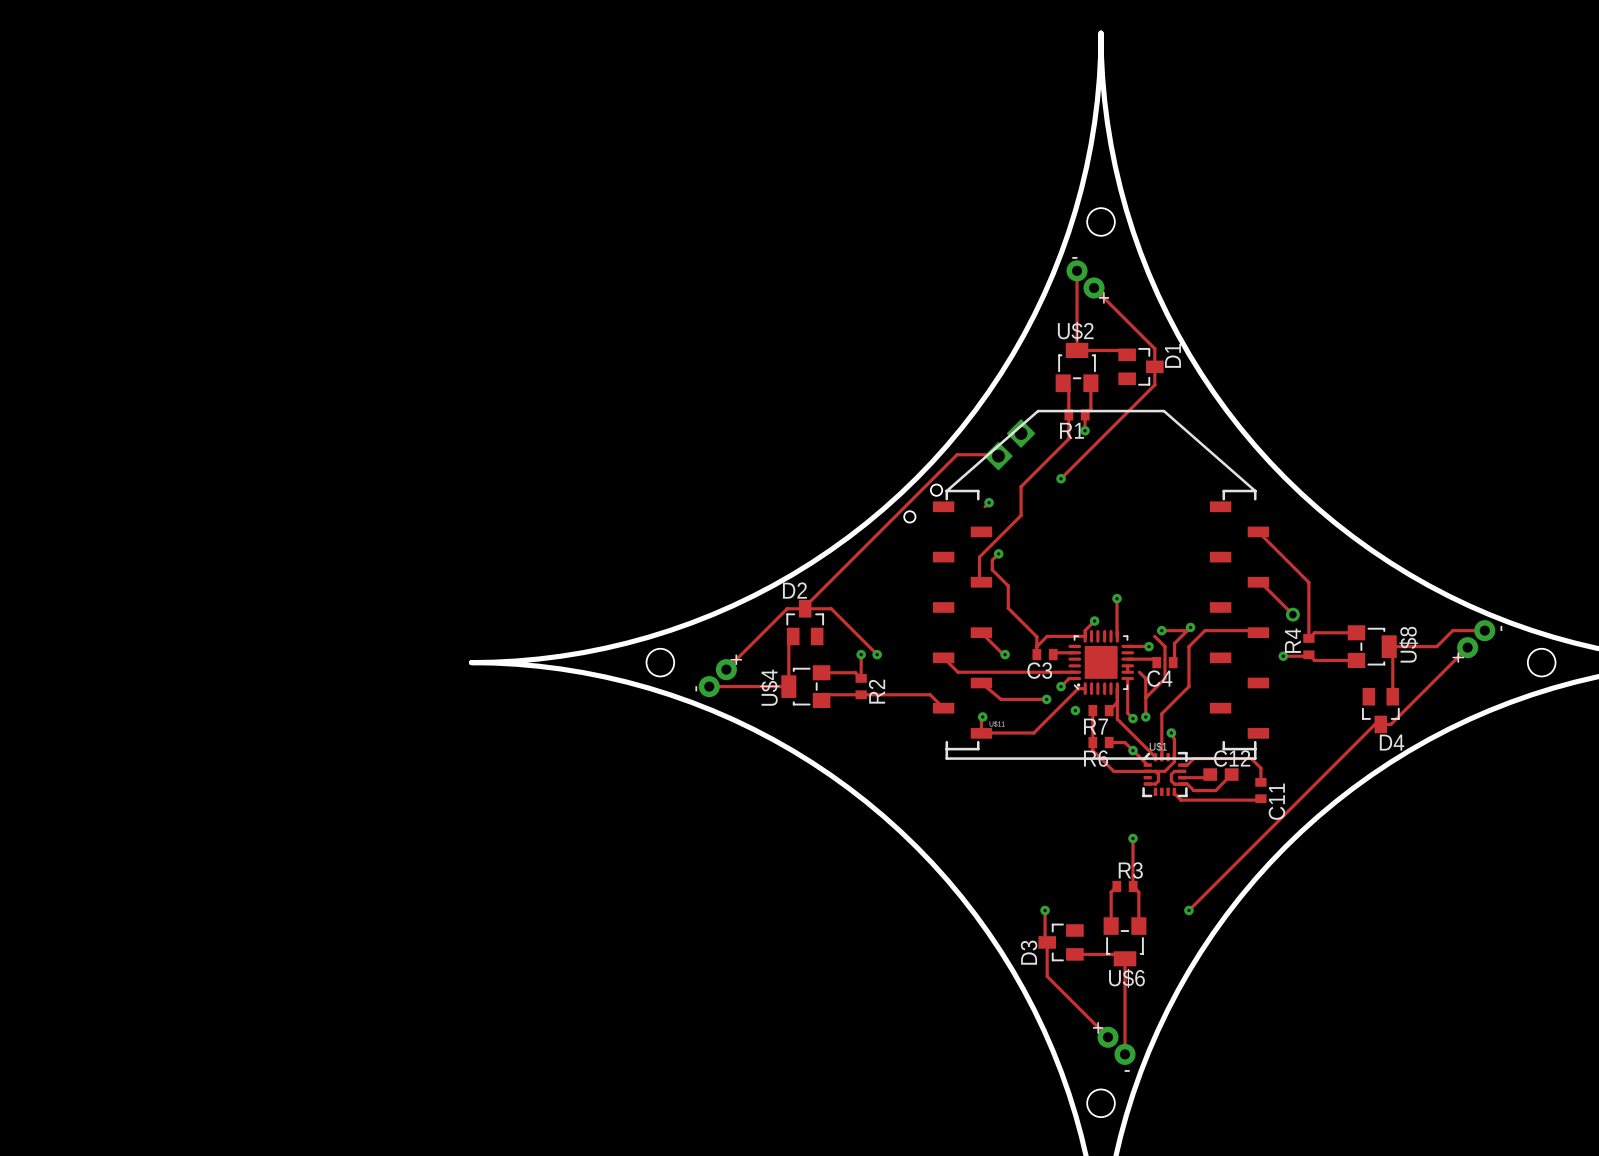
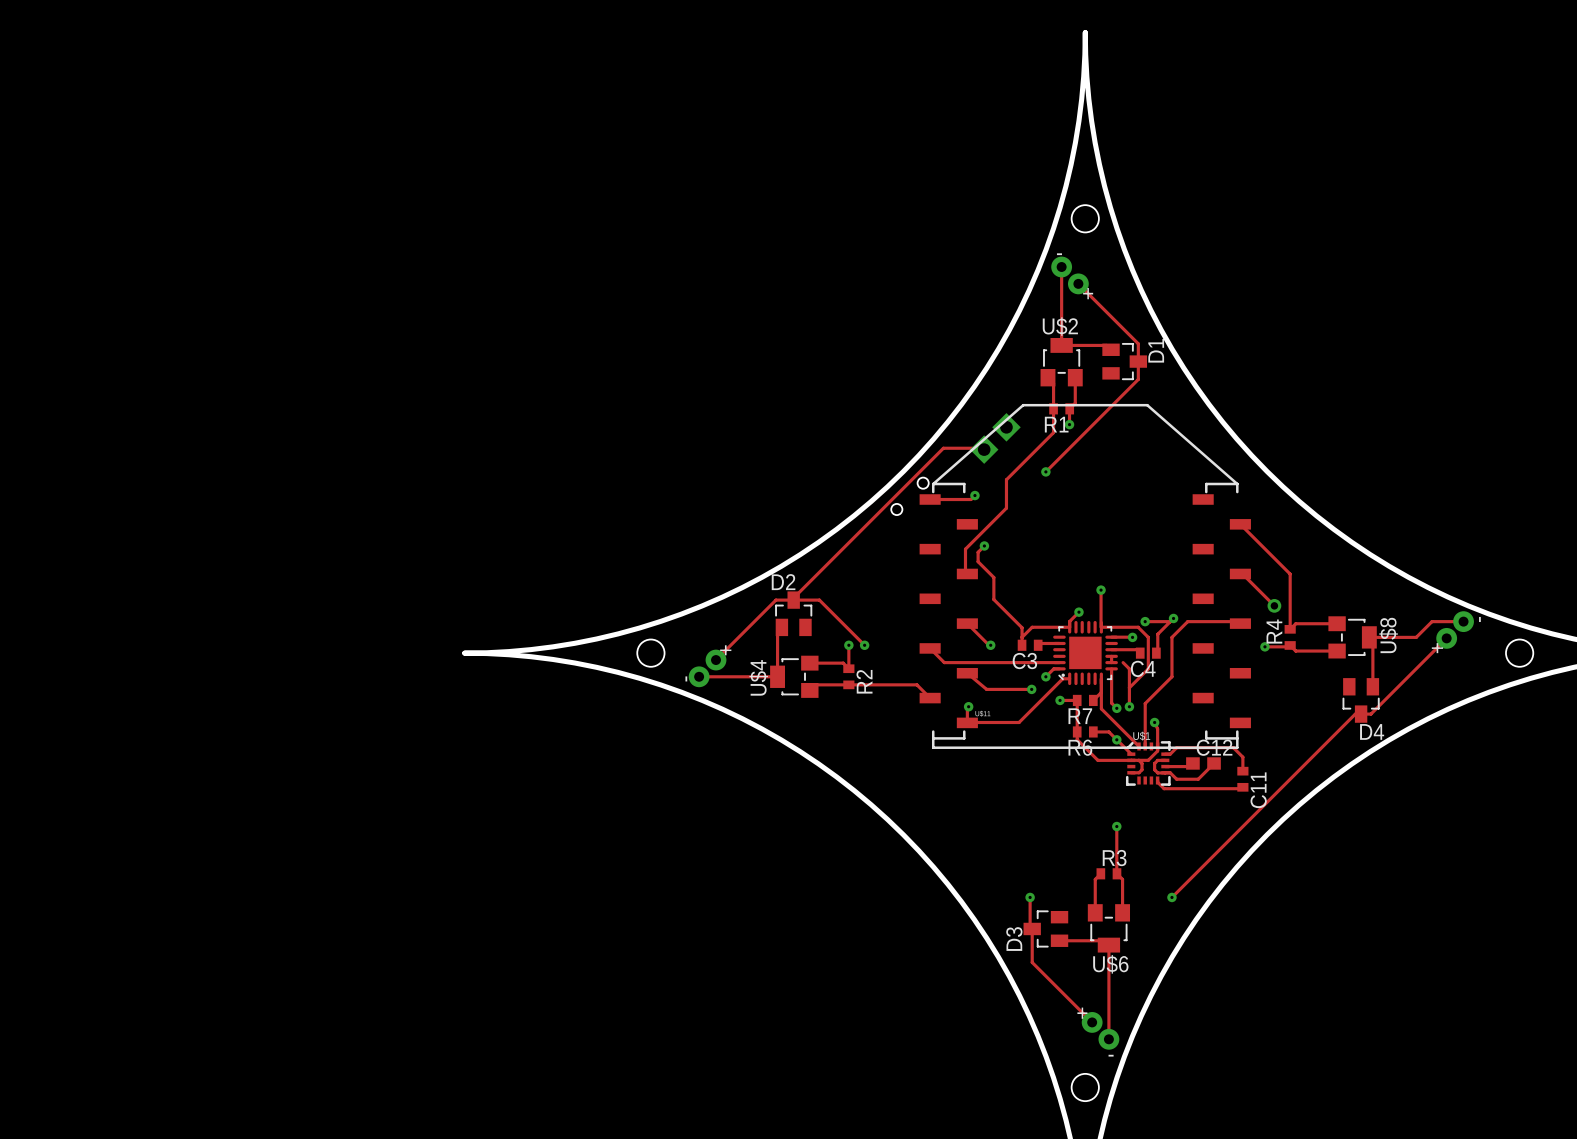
track: none -> (930, 499) (970, 499)
track: none -> (1101, 627) (1138, 627)
track: none -> (1060, 700) (1077, 700)

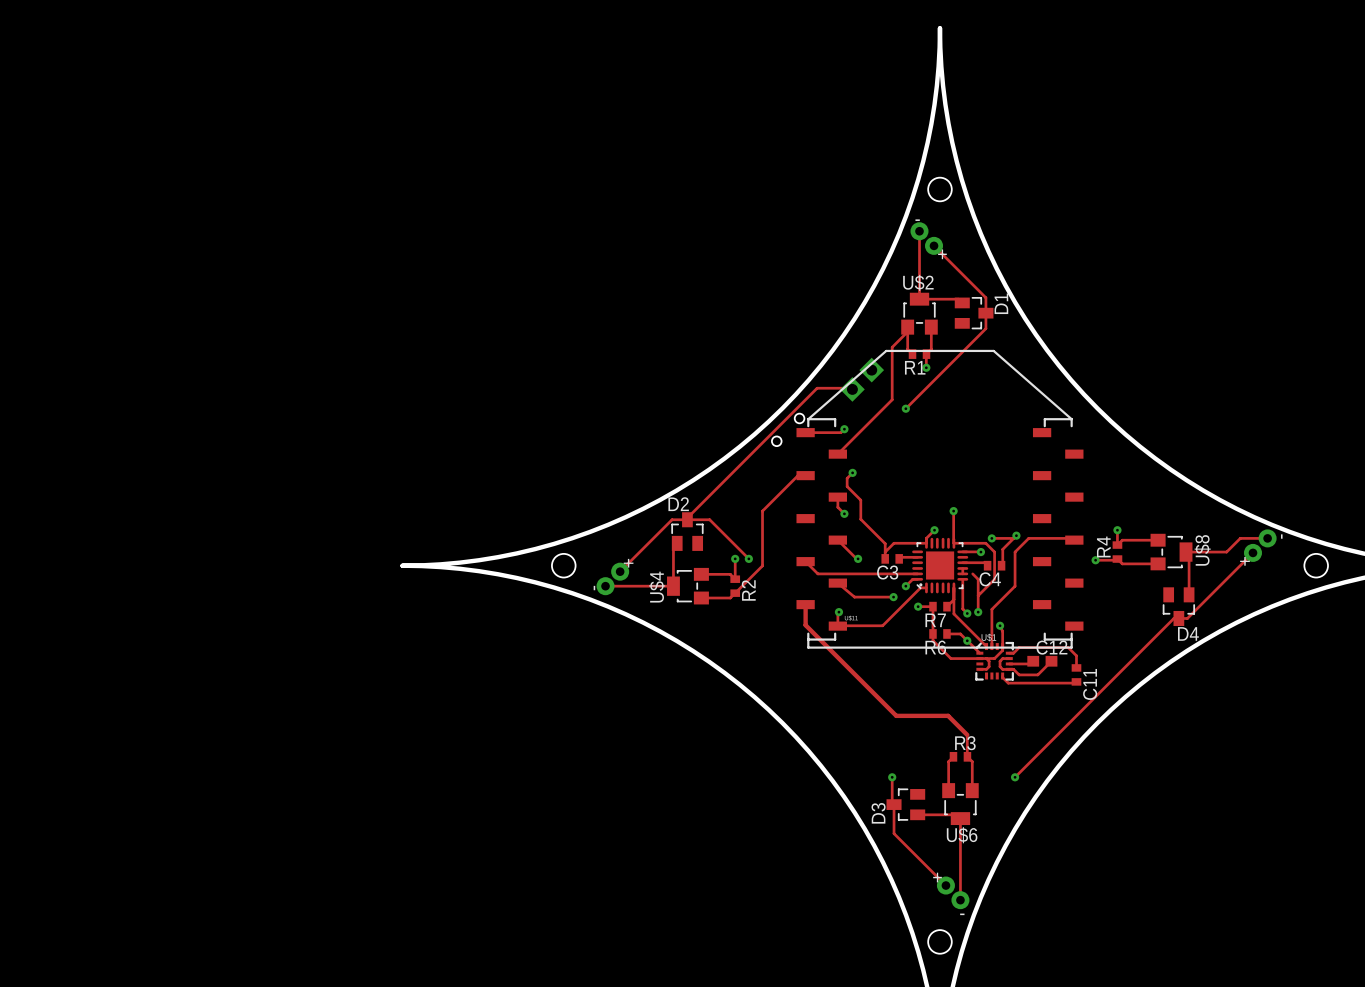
track: (1047, 377) (1053, 383) (1053, 432) (1006, 479) (1006, 508) (965, 549) (965, 572) (967, 573) -> (907, 327) (907, 349) (912, 354)
track: none -> (907, 331) (892, 347) (892, 399) (837, 454)
track: (1240, 524) (1290, 574) (1290, 612) -> none
track: none -> (837, 497) (837, 507) (844, 513)
track: (1240, 573) (1274, 605) -> none
via: none -> (844, 513)
via: (1274, 605) -> none
via: none -> (1117, 530)
track: (809, 690) (815, 684) (916, 684) (930, 698) -> (701, 598) (730, 598) (762, 565) (762, 511) (797, 475) (805, 475)
track: (1116, 826) (1116, 848) -> (805, 604) (805, 625) (896, 715) (948, 715) (967, 734)
via: (1116, 826) -> none

